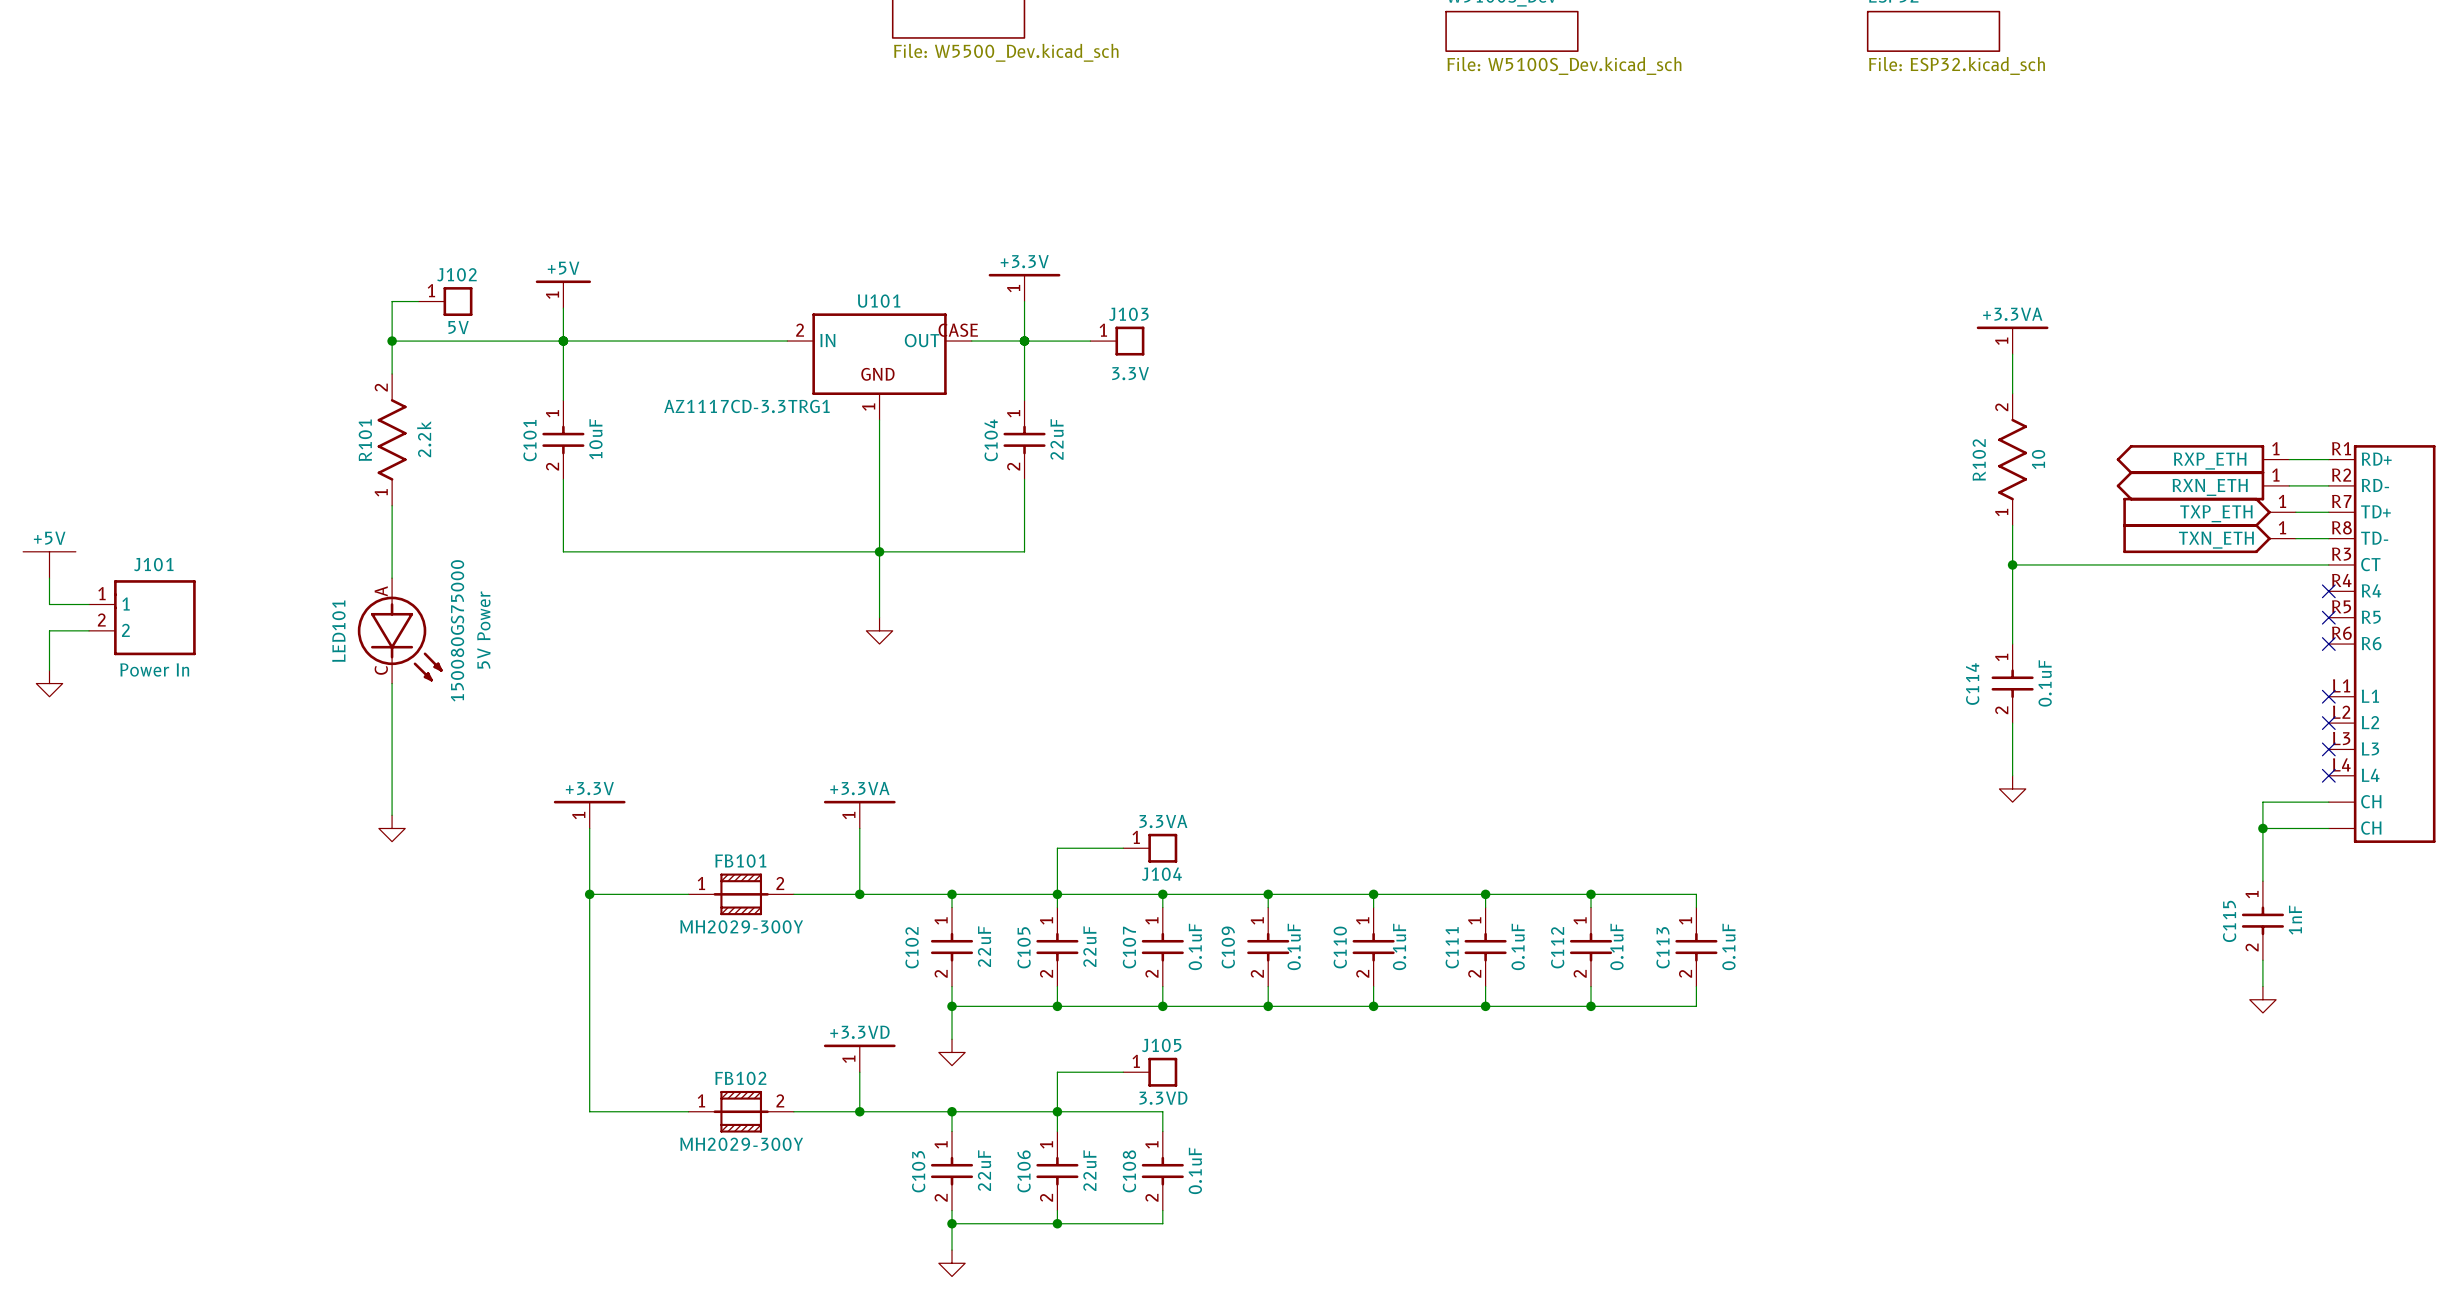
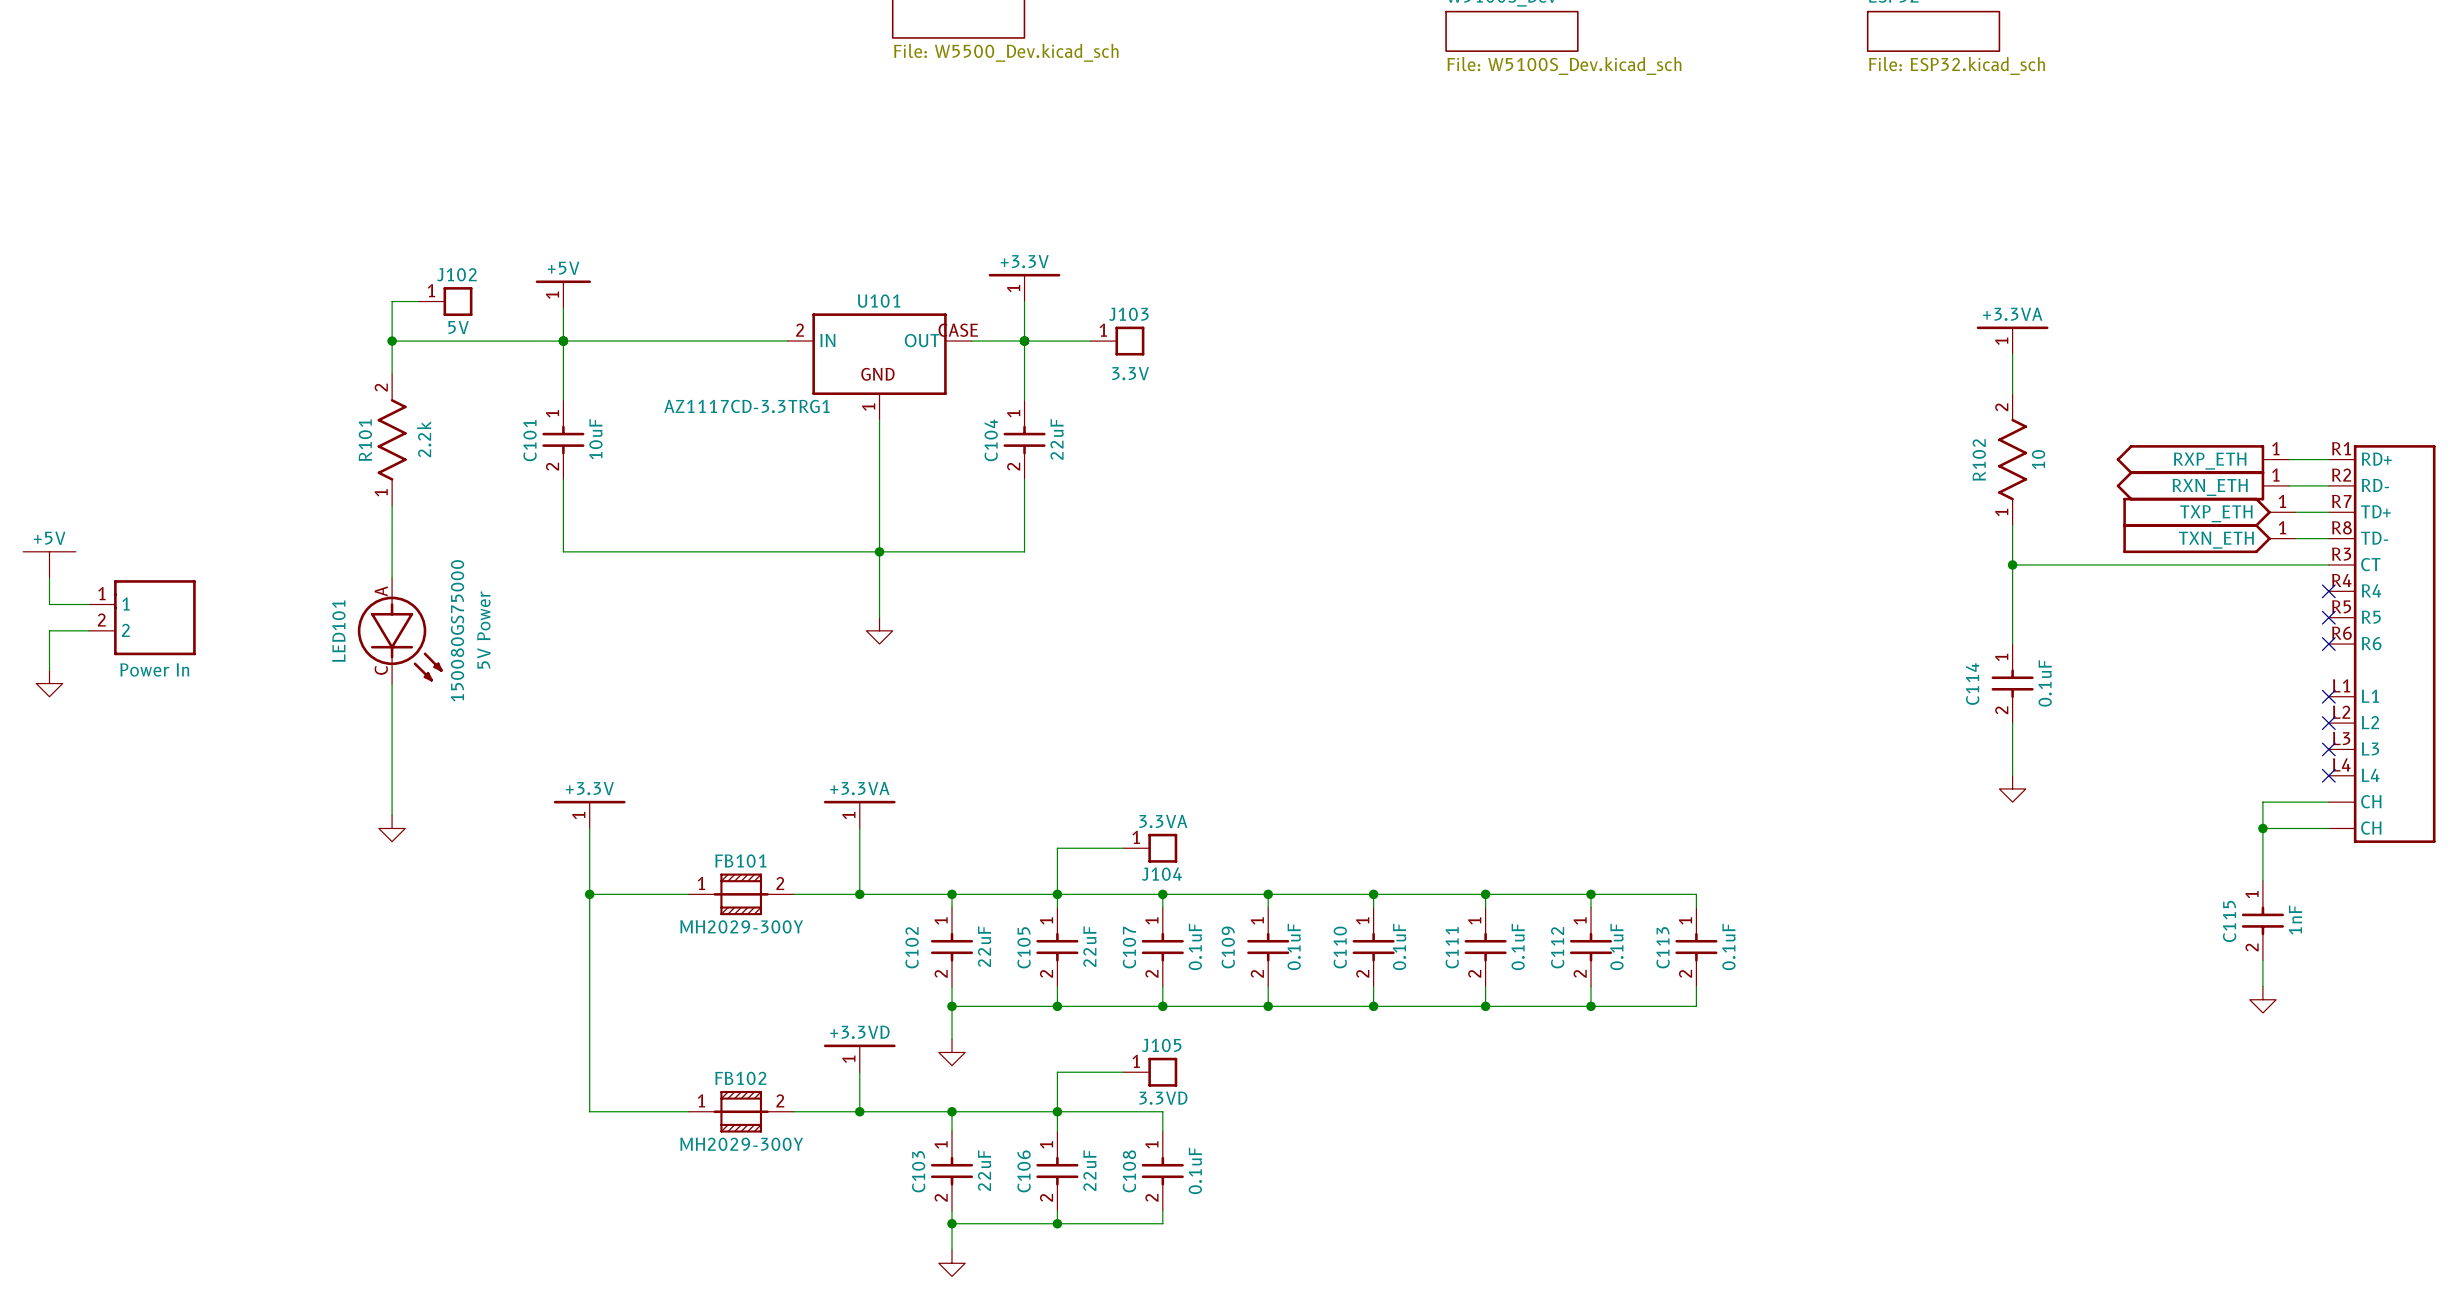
J101 name: J101 (153, 564) -> none

